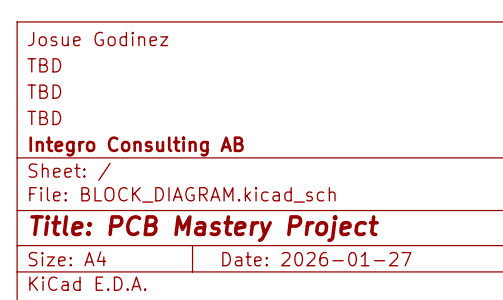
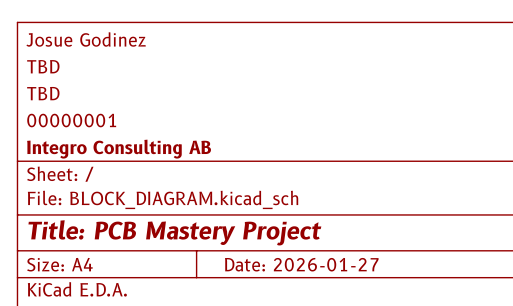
title block: TBD (44, 117) -> 00000001 (71, 120)

